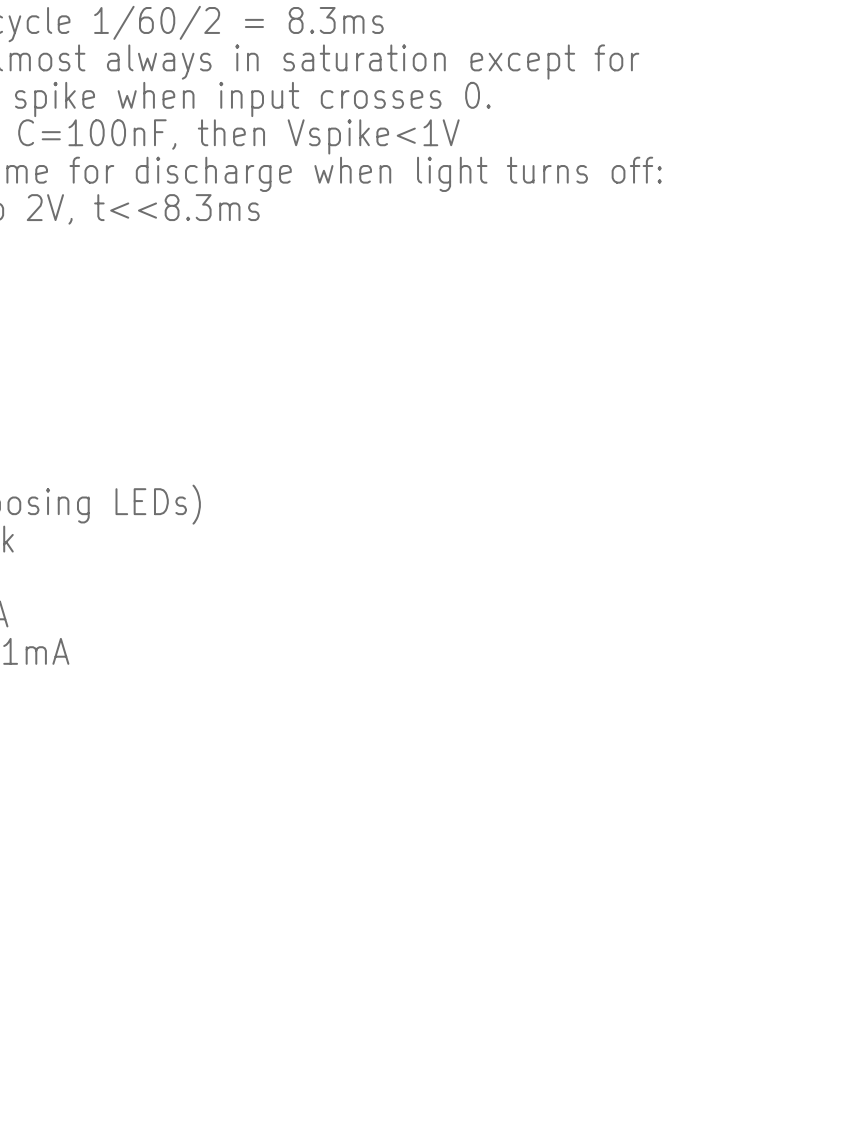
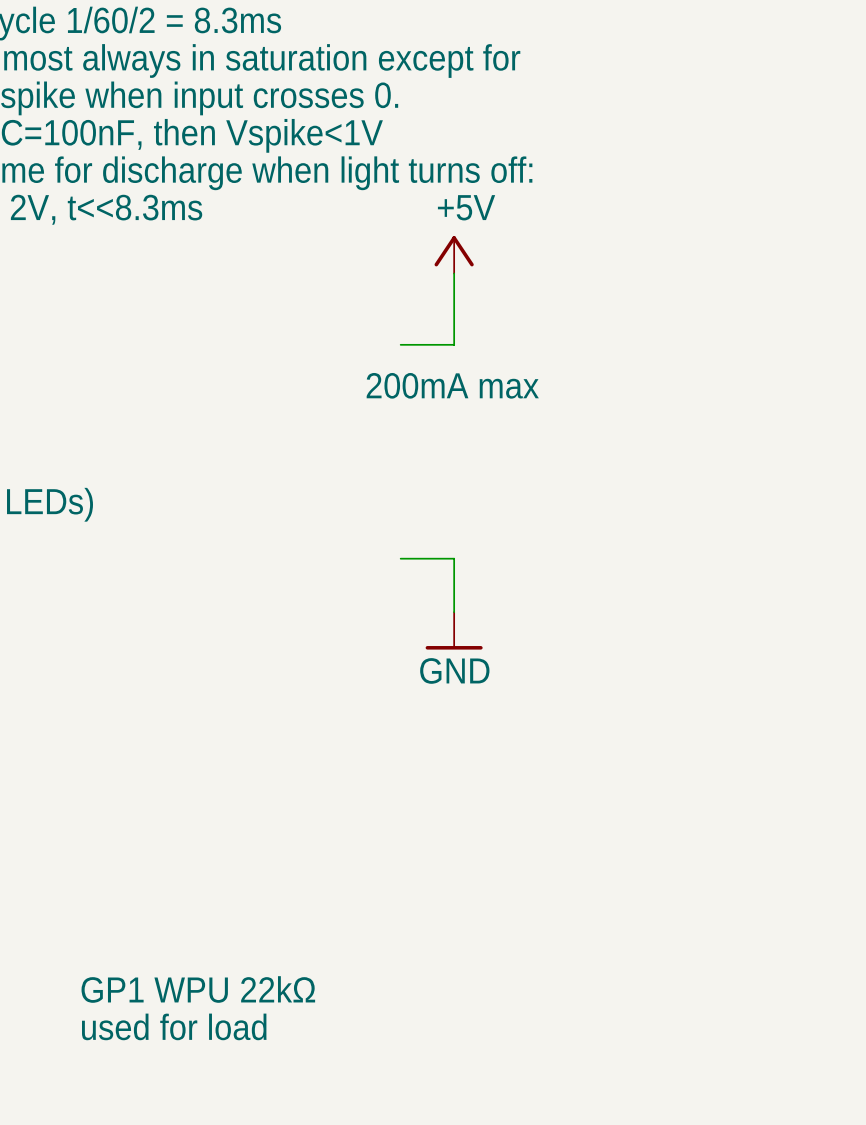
power symbol: none -> +5V (454, 254)
wire: none -> (454, 273) (454, 344) (400, 344)
text: none -> 200mA max (452, 385)
wire: none -> (400, 558) (454, 558) (454, 612)
power symbol: none -> GND (454, 630)
text: none -> GP1 WPU 22kΩ (198, 989)
text: none -> used for load (174, 1026)

